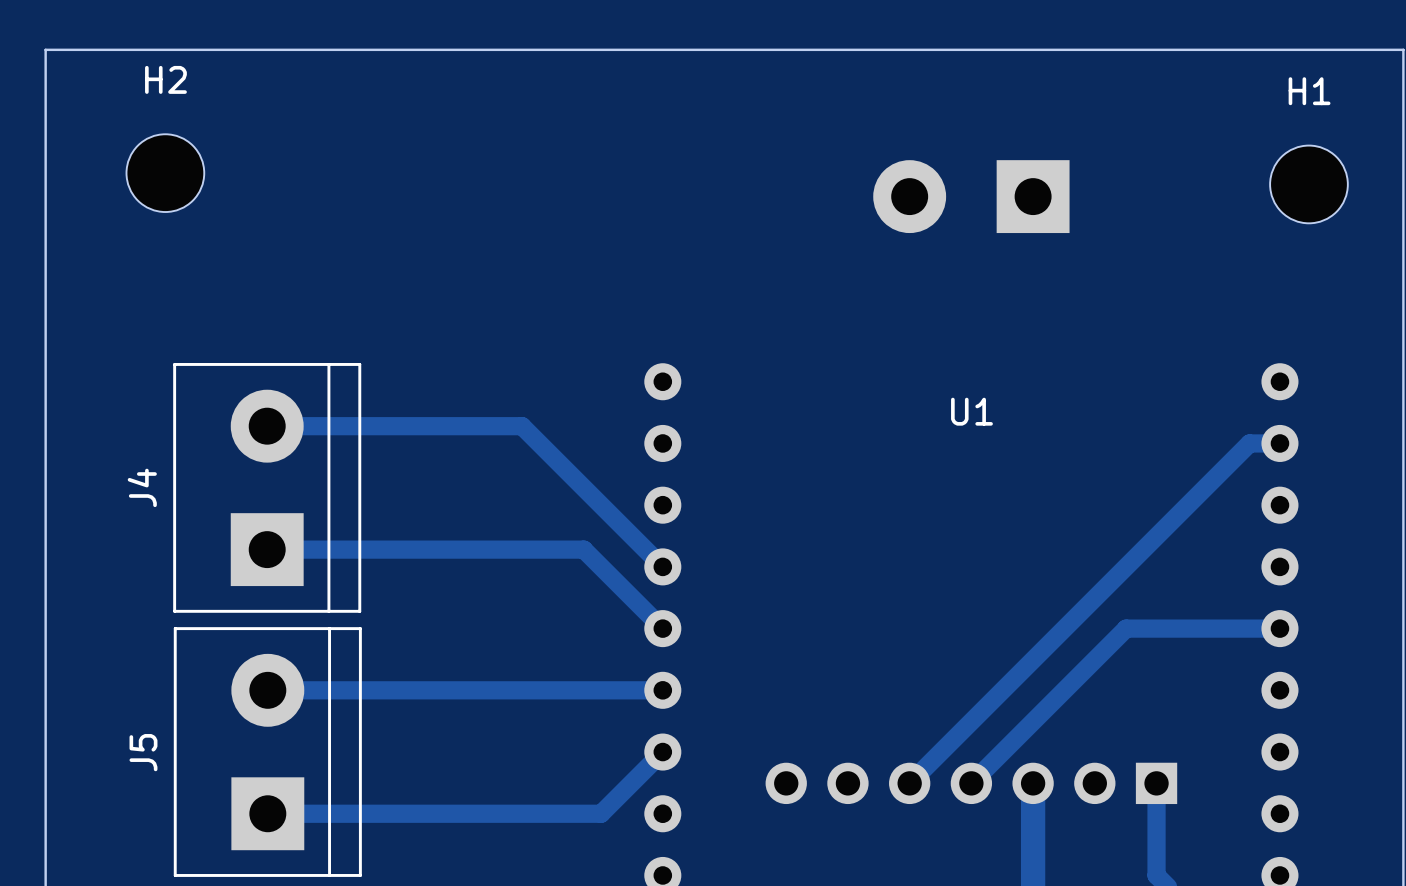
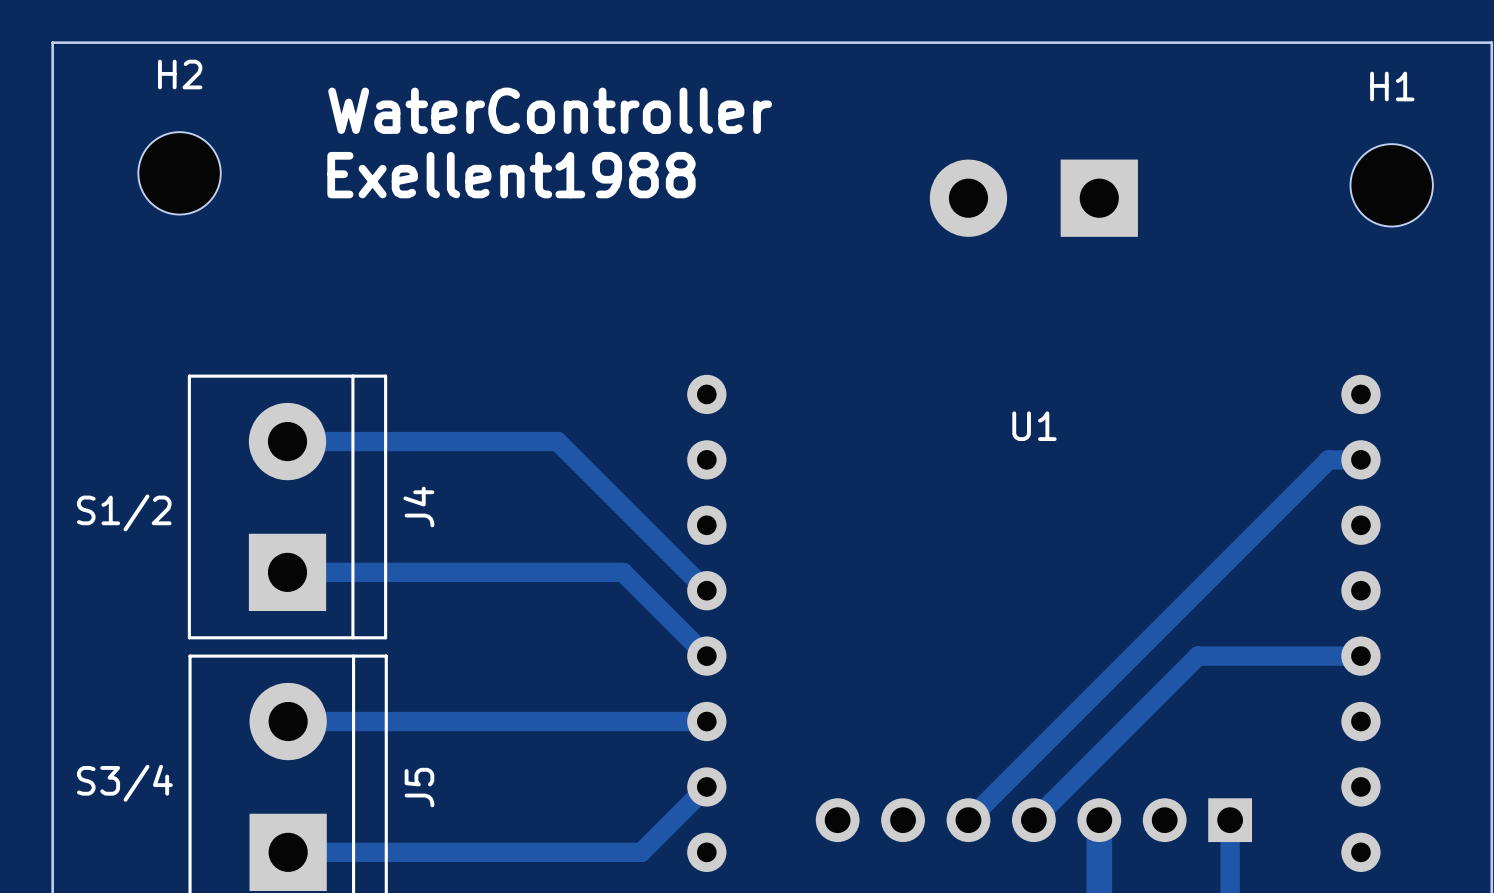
text: none -> WaterController (550, 110)
text: none -> Exellent1988 (511, 175)
J4 name position: J4 (142, 487) -> J4 (418, 506)
text: none -> S1/2 (124, 512)
text: none -> S3/4 (124, 783)
J5 name position: J5 (143, 752) -> J5 (419, 787)

